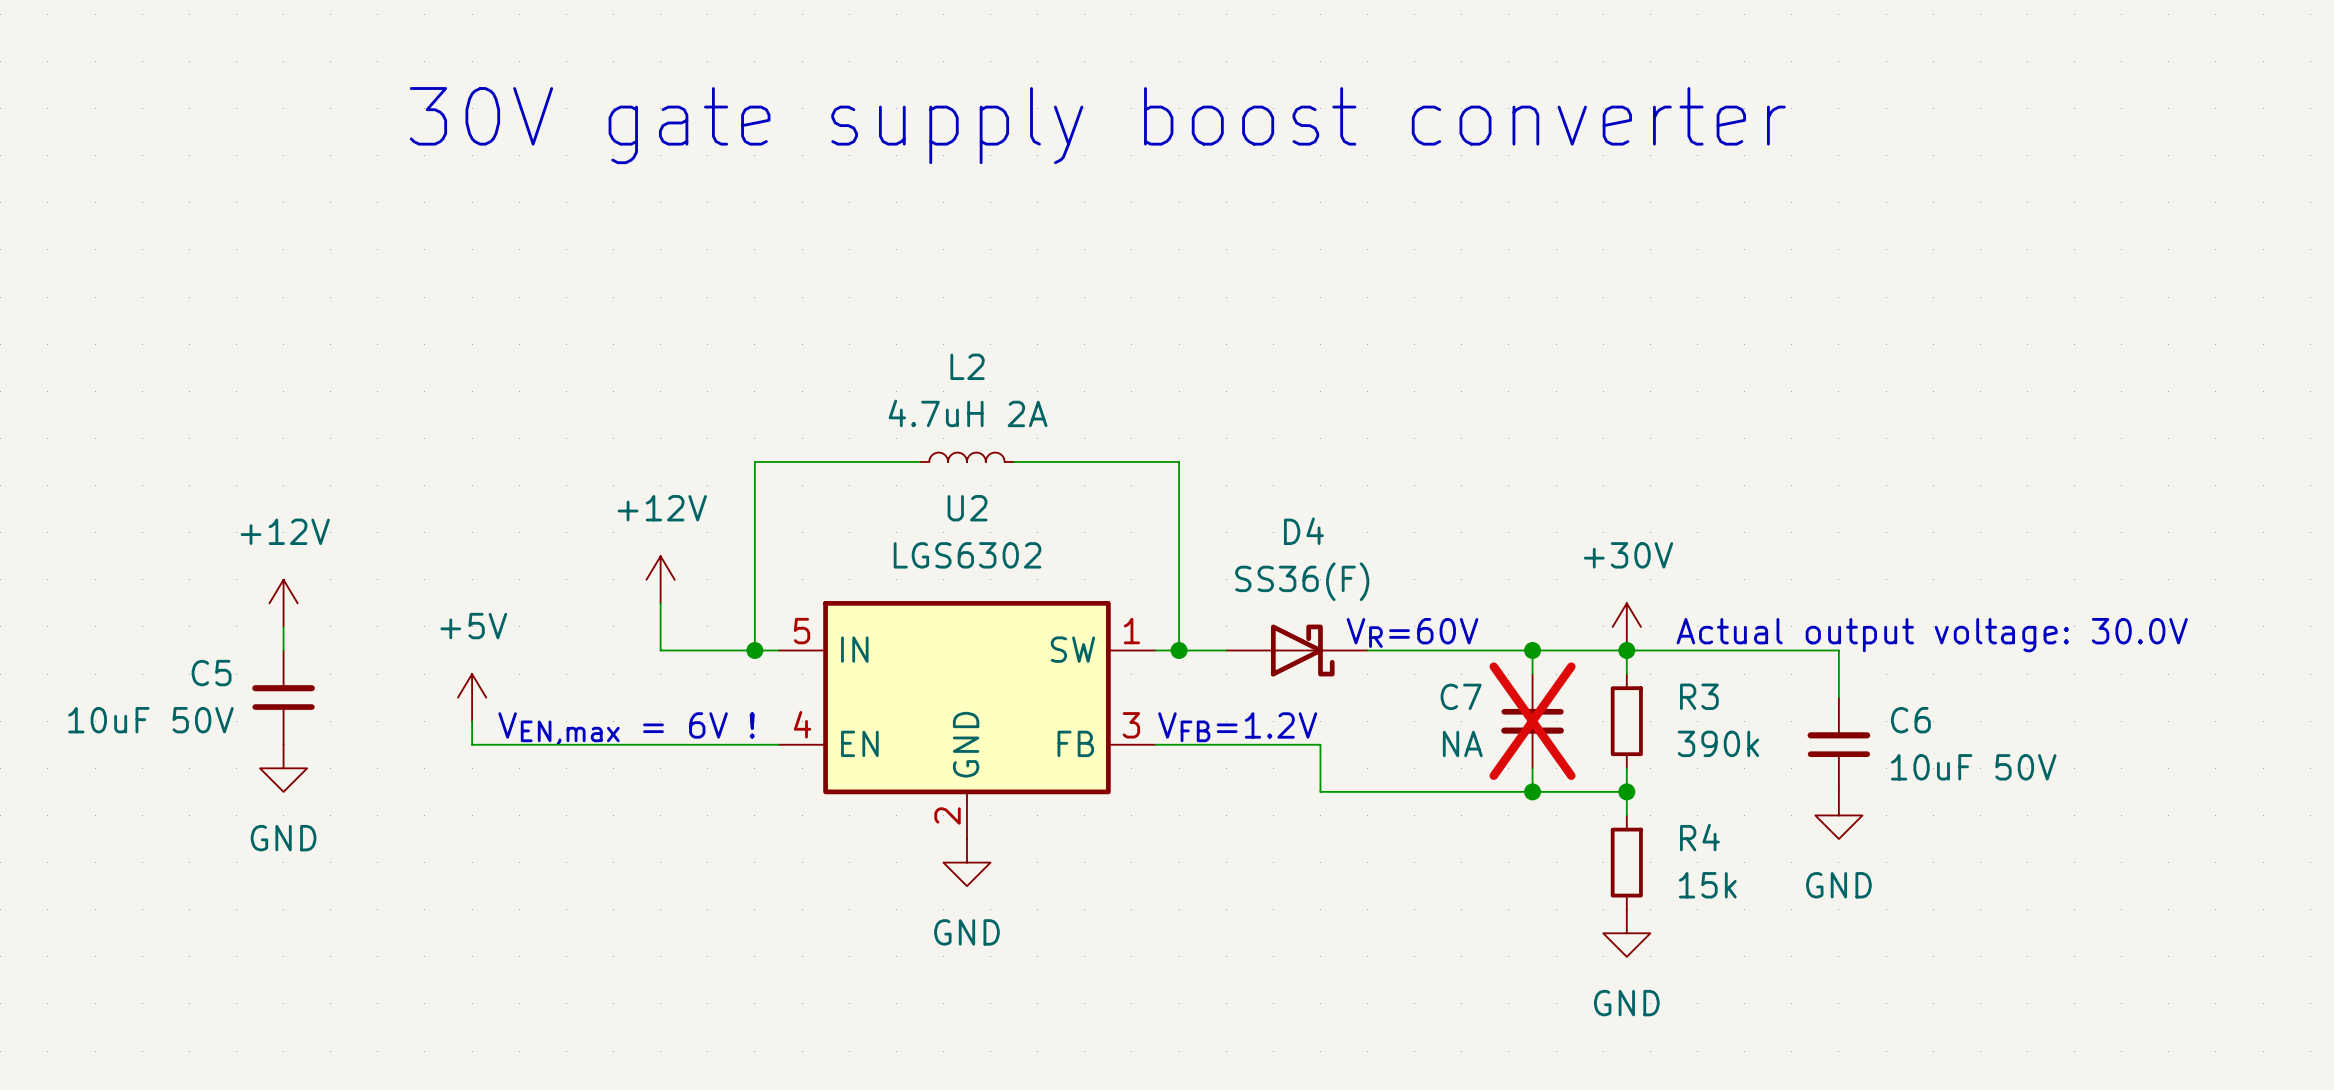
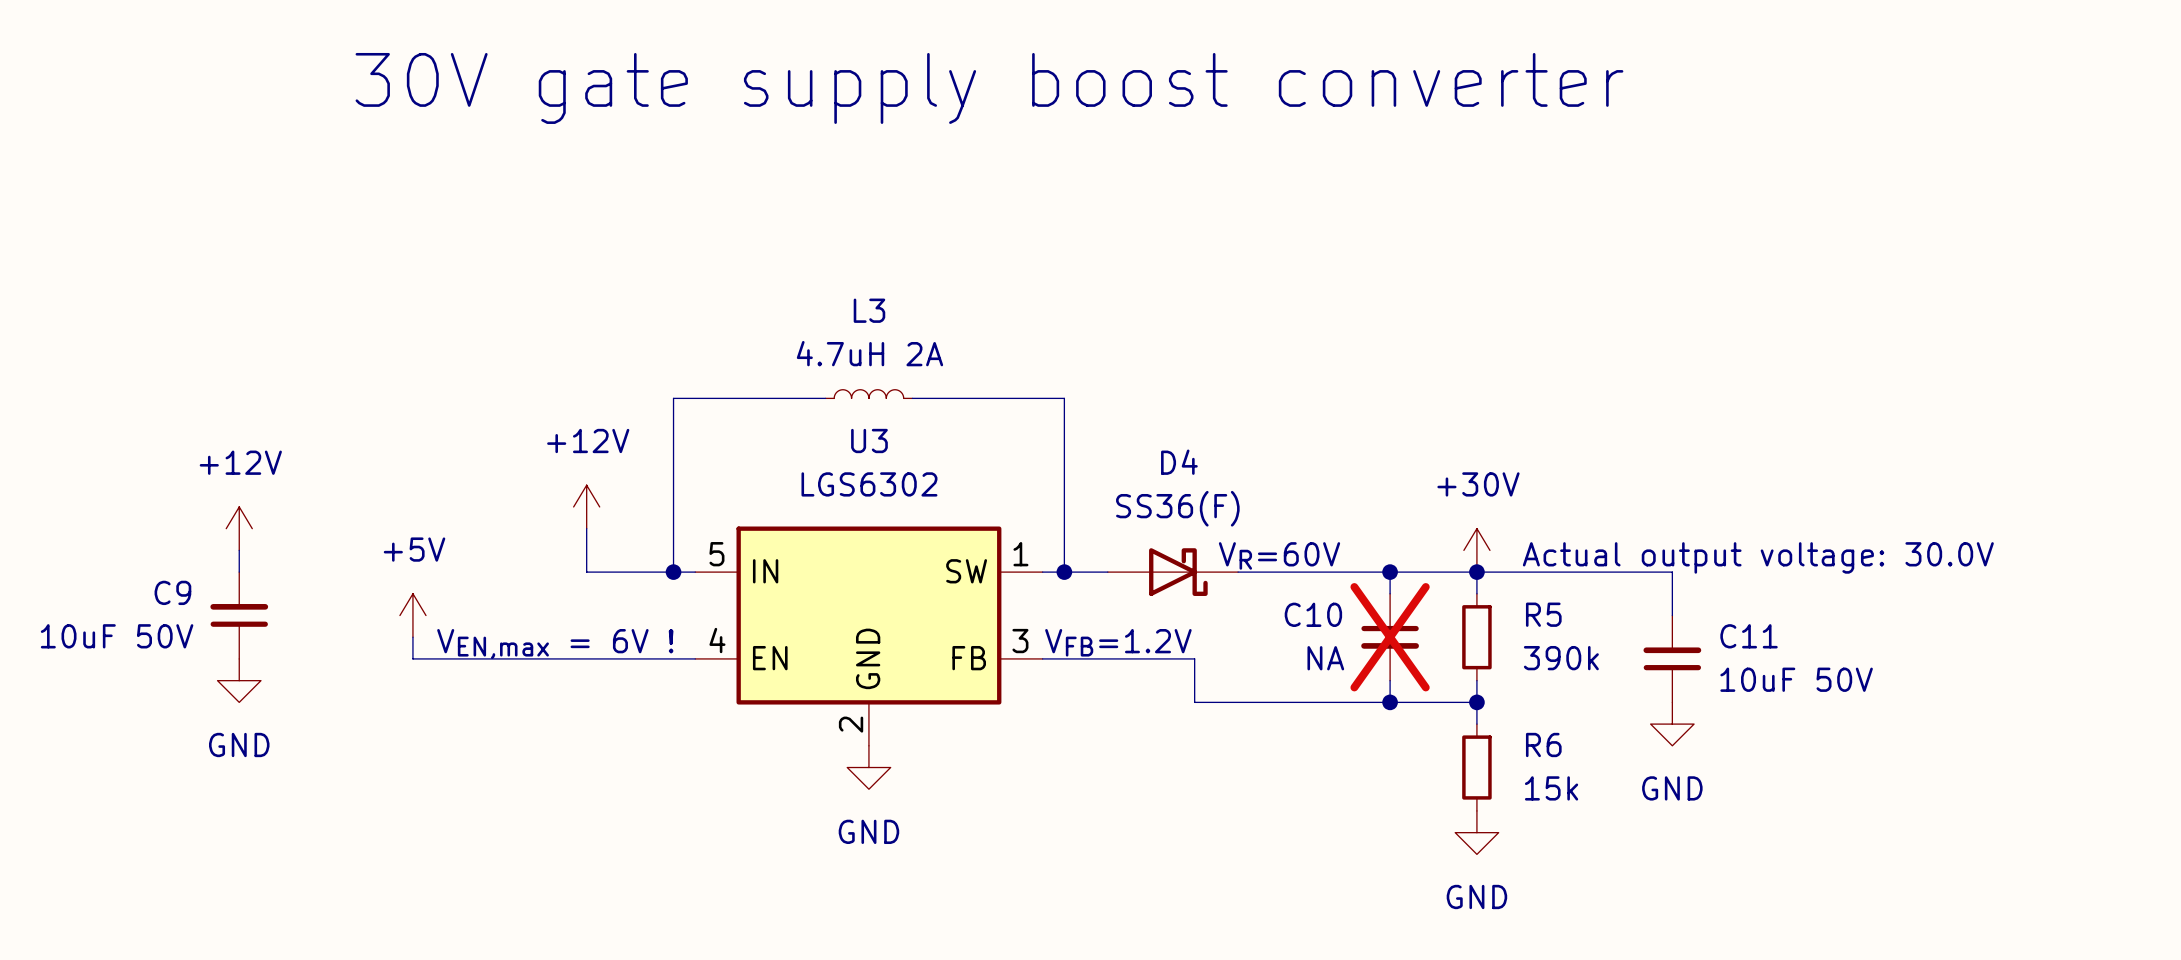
L2 name: L2 (967, 366) -> L3 (869, 310)
U2 name: U2 (967, 508) -> U3 (869, 441)
C5 name: C5 (211, 673) -> C9 (172, 592)
C7 name: C7 (1461, 696) -> C10 (1313, 614)
R3 name: R3 (1699, 696) -> R5 (1543, 614)
C6 name: C6 (1910, 720) -> C11 (1749, 636)
R4 name: R4 (1699, 837) -> R6 (1543, 744)

